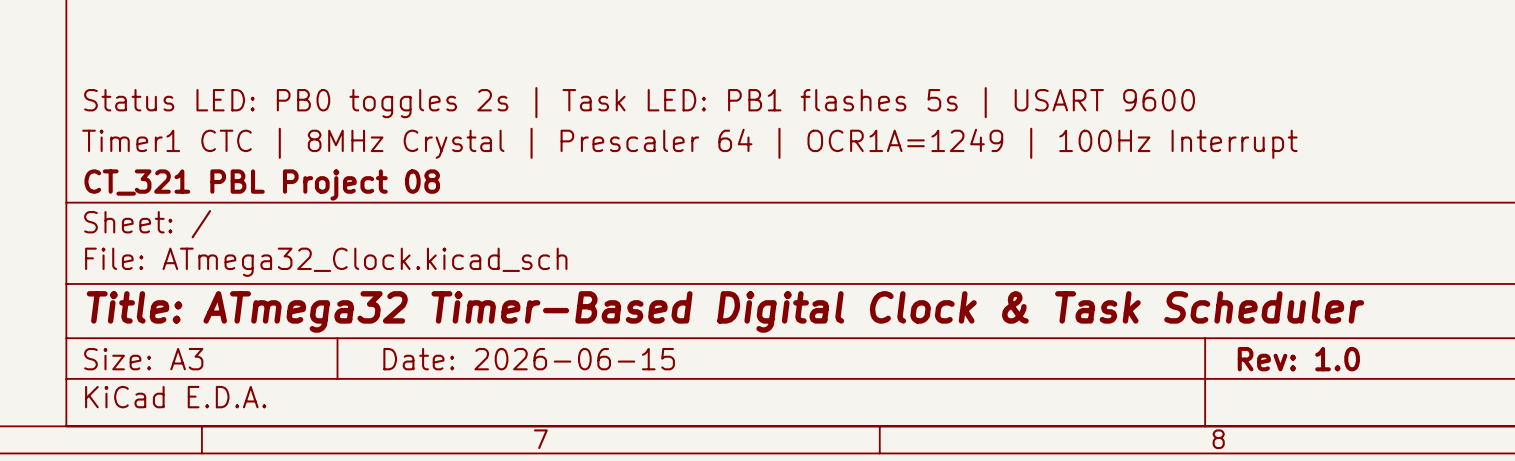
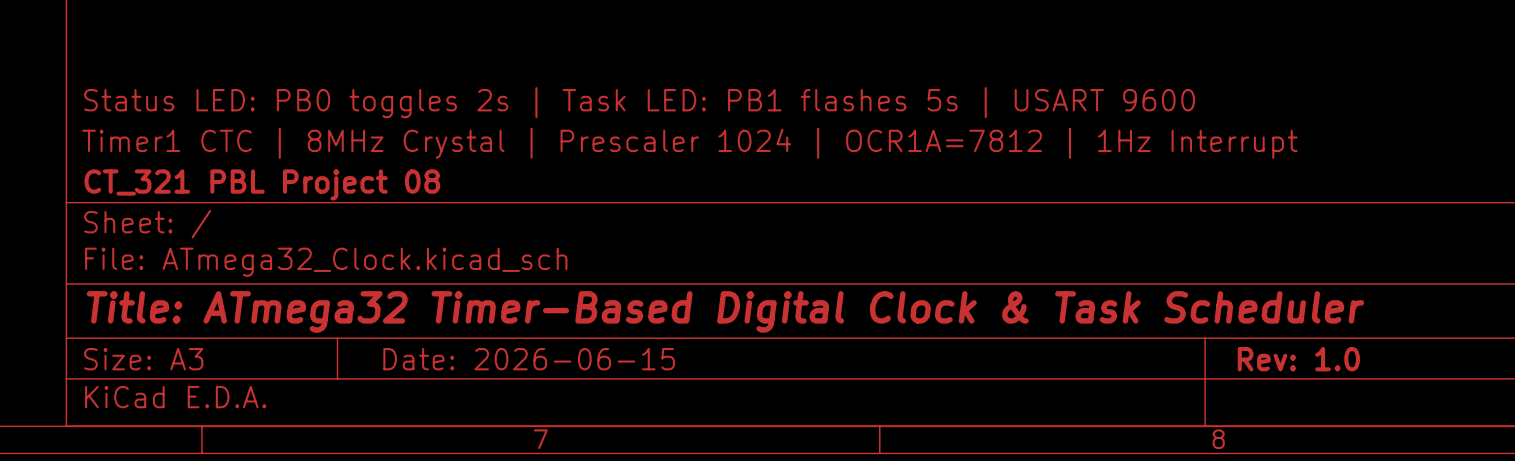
title block: Timer1 CTC | 8MHz Crystal | Prescaler 64 | OCR1A=1249 | 100Hz Interrupt (689, 143) -> Timer1 CTC | 8MHz Crystal | Prescaler 1024 | OCR1A=7812 | 1Hz Interrupt (689, 143)

